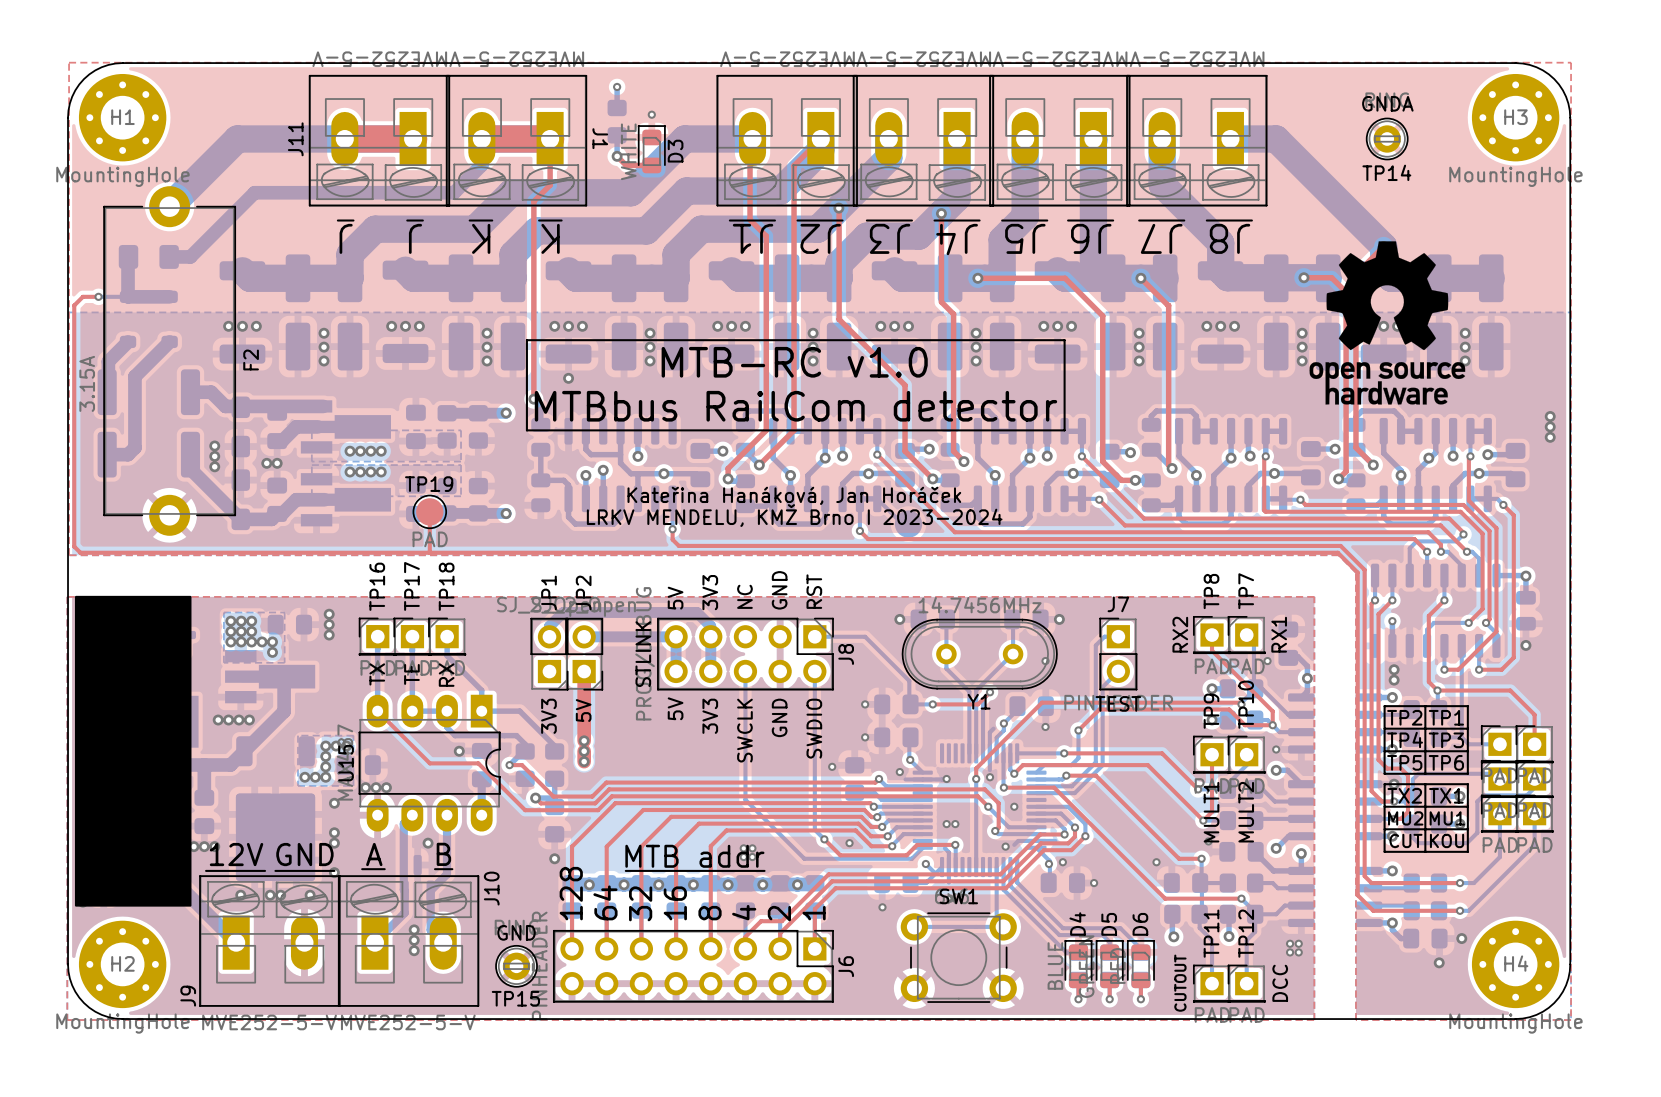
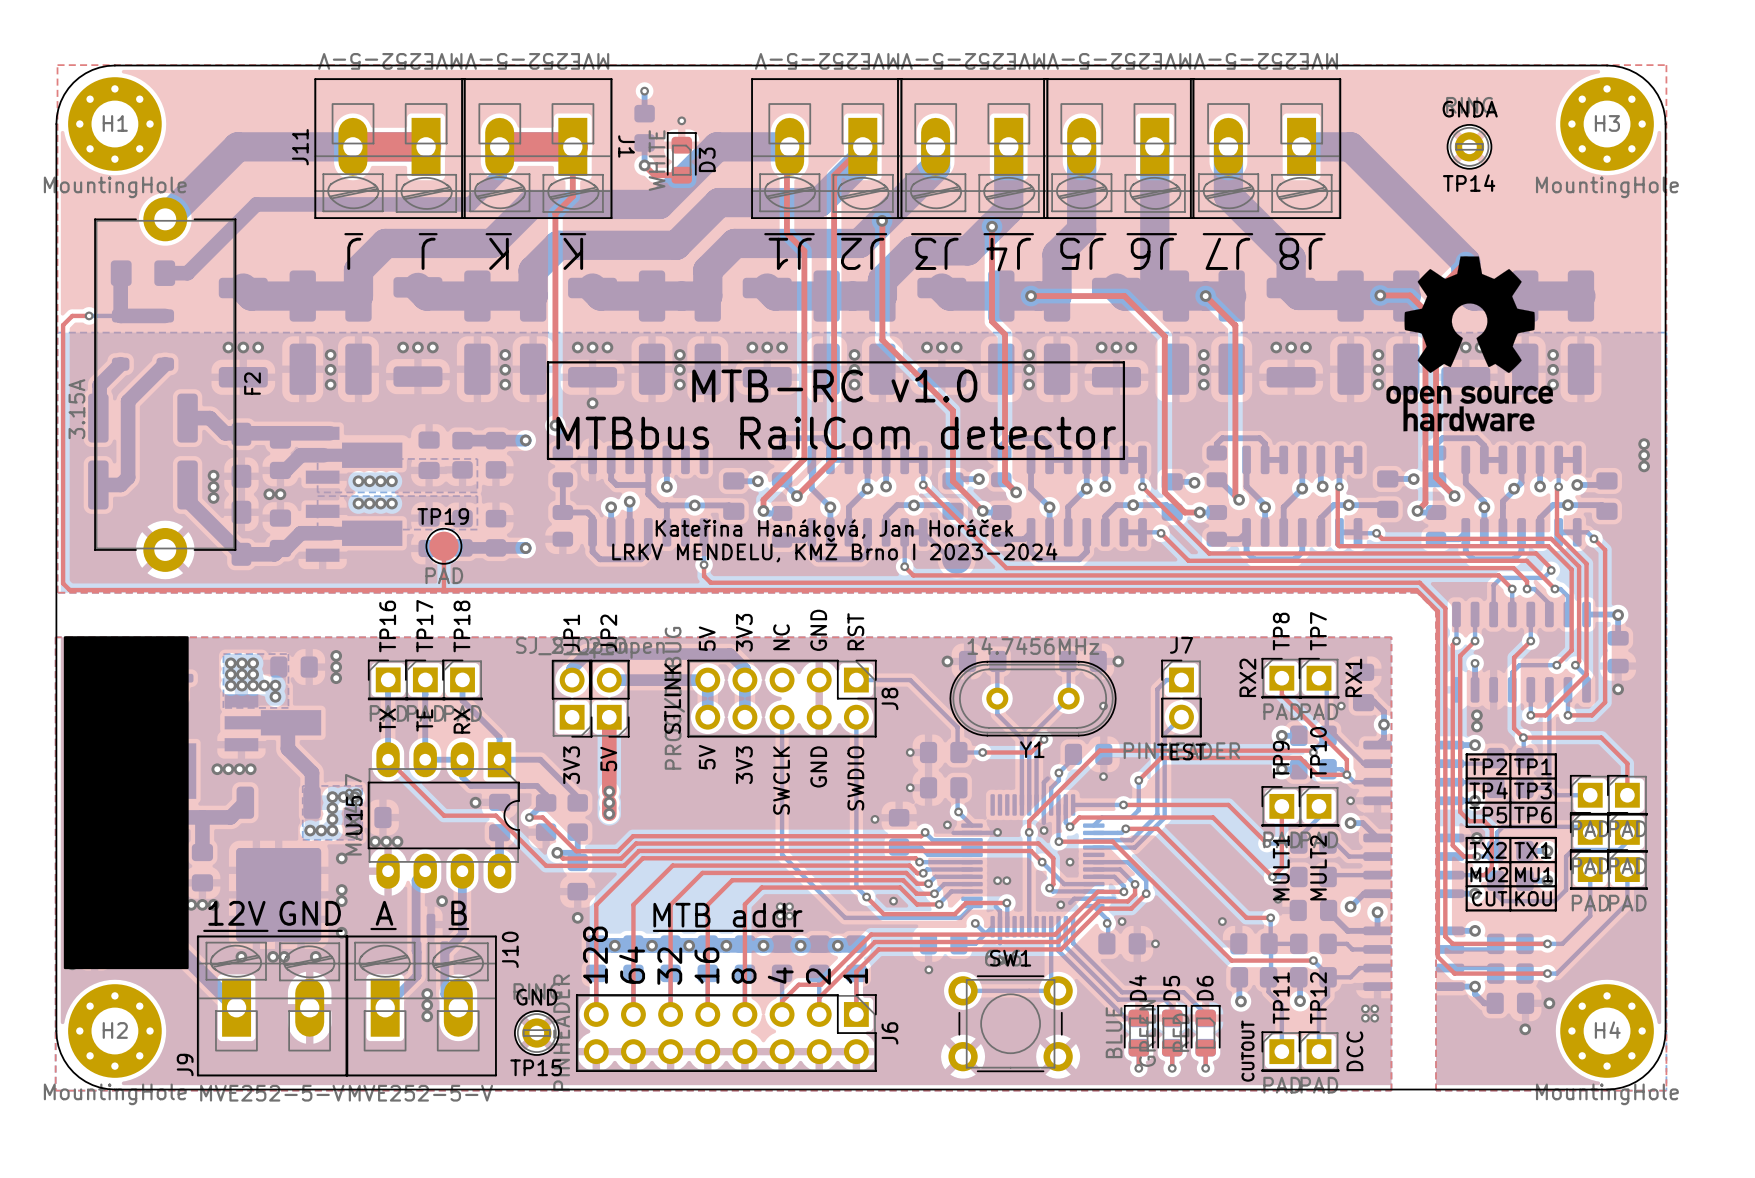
bottom track: (284, 700) (284, 711) (244, 751) -> (287, 748) (312, 772) (312, 802)

